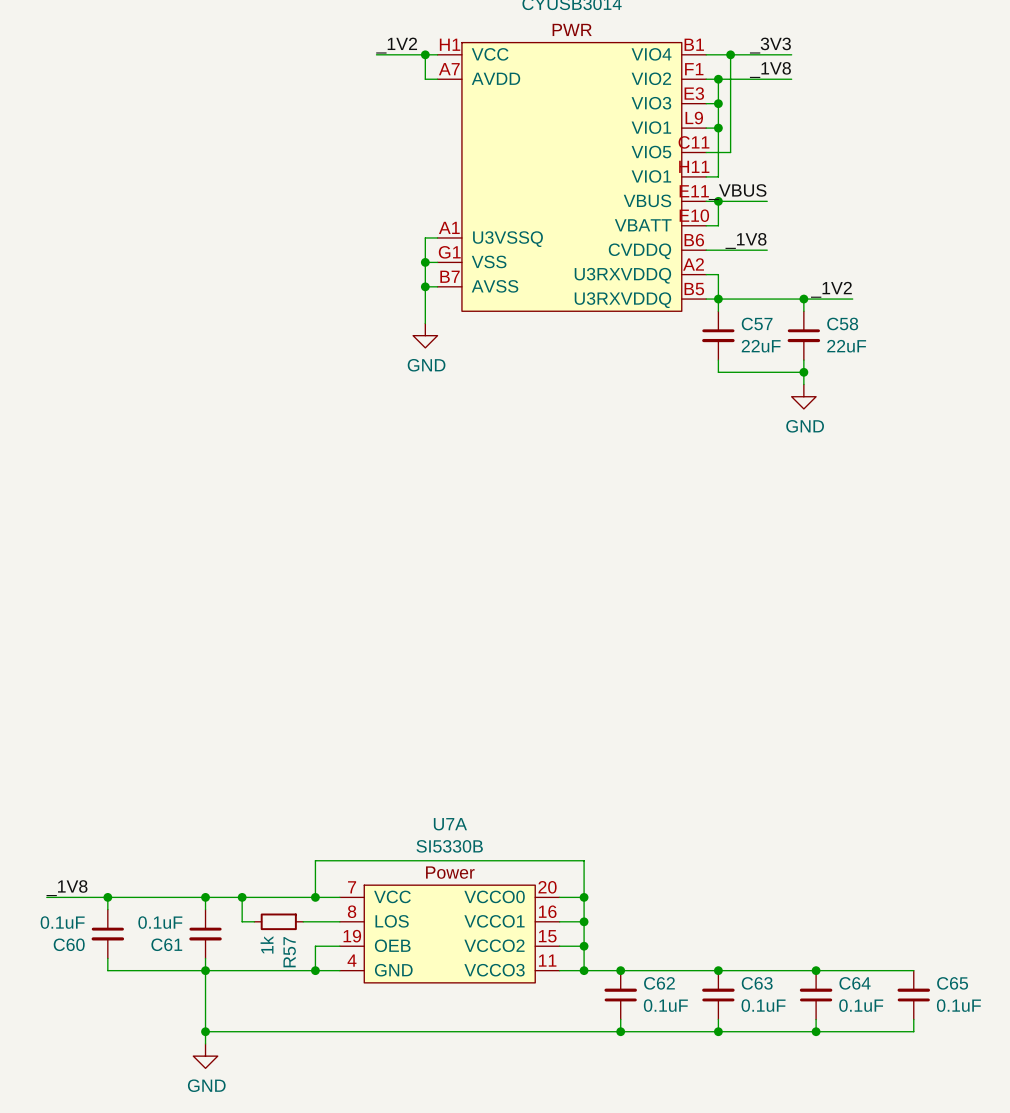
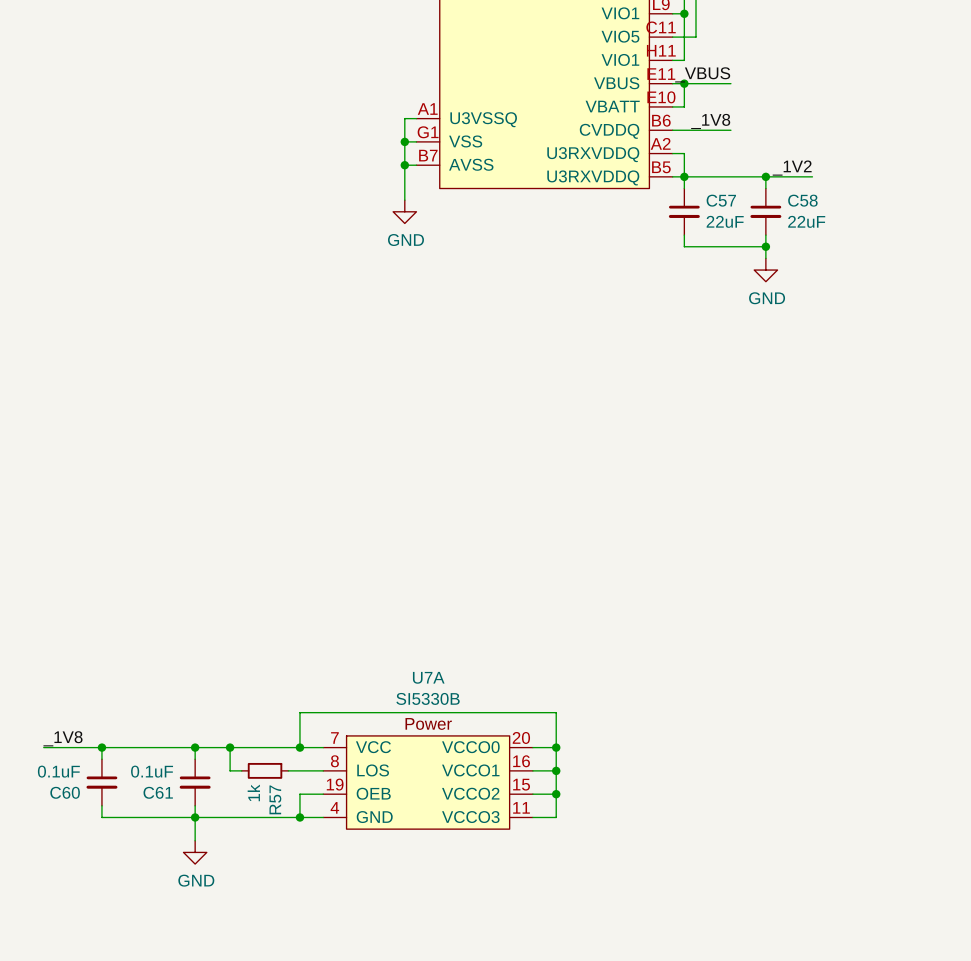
wire: (584, 970) (913, 970) -> none
junction: (584, 970) -> none
junction: (620, 970) -> none
junction: (718, 970) -> none
junction: (816, 970) -> none
wire: (205, 995) (205, 1043) -> none
C62: 0.1uF (620, 995) -> none
C63: 0.1uF (718, 995) -> none
C64: 0.1uF (816, 995) -> none
C65: 0.1uF (913, 995) -> none
wire: (620, 1019) (620, 1031) -> none
wire: (718, 1019) (718, 1031) -> none
wire: (816, 1019) (816, 1031) -> none
wire: (913, 1019) (913, 1031) (205, 1031) -> none
junction: (205, 1031) -> none
junction: (620, 1031) -> none
junction: (718, 1031) -> none
junction: (816, 1031) -> none
power symbol position: GND (205, 1056) -> GND (195, 852)

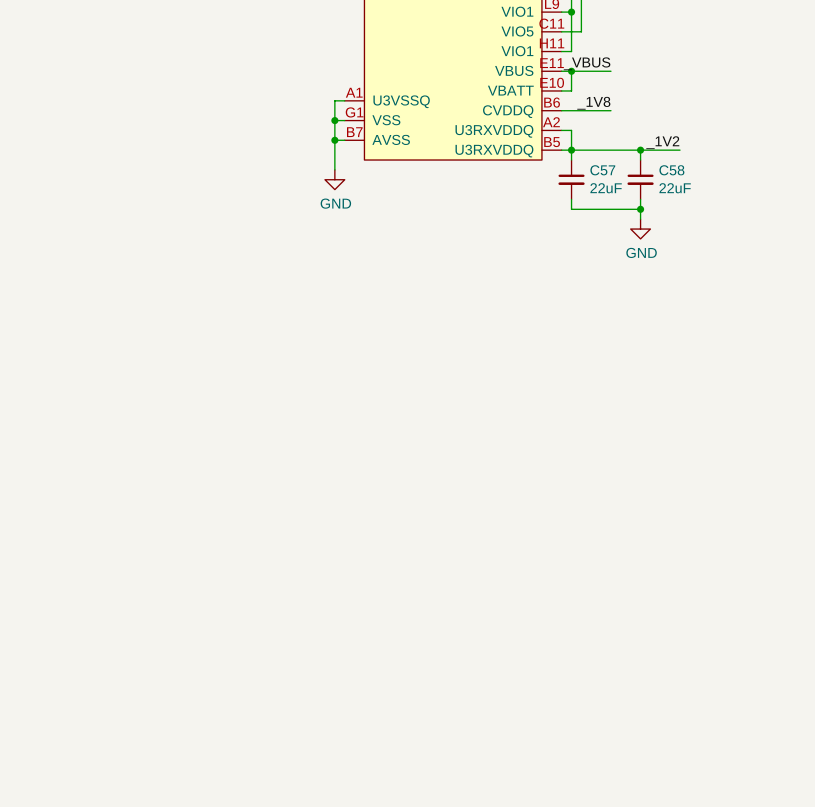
label: _1V8 (63, 738) -> none
wire: (43, 747) (323, 747) -> none
wire: (101, 747) (101, 759) -> none
junction: (101, 747) -> none
wire: (195, 747) (195, 759) -> none
junction: (195, 747) -> none
wire: (230, 747) (230, 770) (241, 770) -> none
junction: (230, 747) -> none
wire: (299, 747) (299, 712) (556, 712) (556, 817) (532, 817) -> none
junction: (299, 747) -> none
wire: (532, 747) (556, 747) -> none
junction: (556, 747) -> none
R57: 1k (265, 770) -> none
wire: (288, 770) (323, 770) -> none
wire: (532, 770) (556, 770) -> none
junction: (556, 770) -> none
C60: 0.1uF (101, 782) -> none
C61: 0.1uF (195, 782) -> none
U7A: SI5330B (428, 782) -> none
wire: (323, 794) (299, 794) (299, 817) -> none
wire: (532, 794) (556, 794) -> none
junction: (556, 794) -> none
wire: (101, 805) (101, 817) (323, 817) -> none
wire: (195, 805) (195, 840) -> none
junction: (195, 817) -> none
junction: (299, 817) -> none
power symbol: GND (195, 852) -> none

